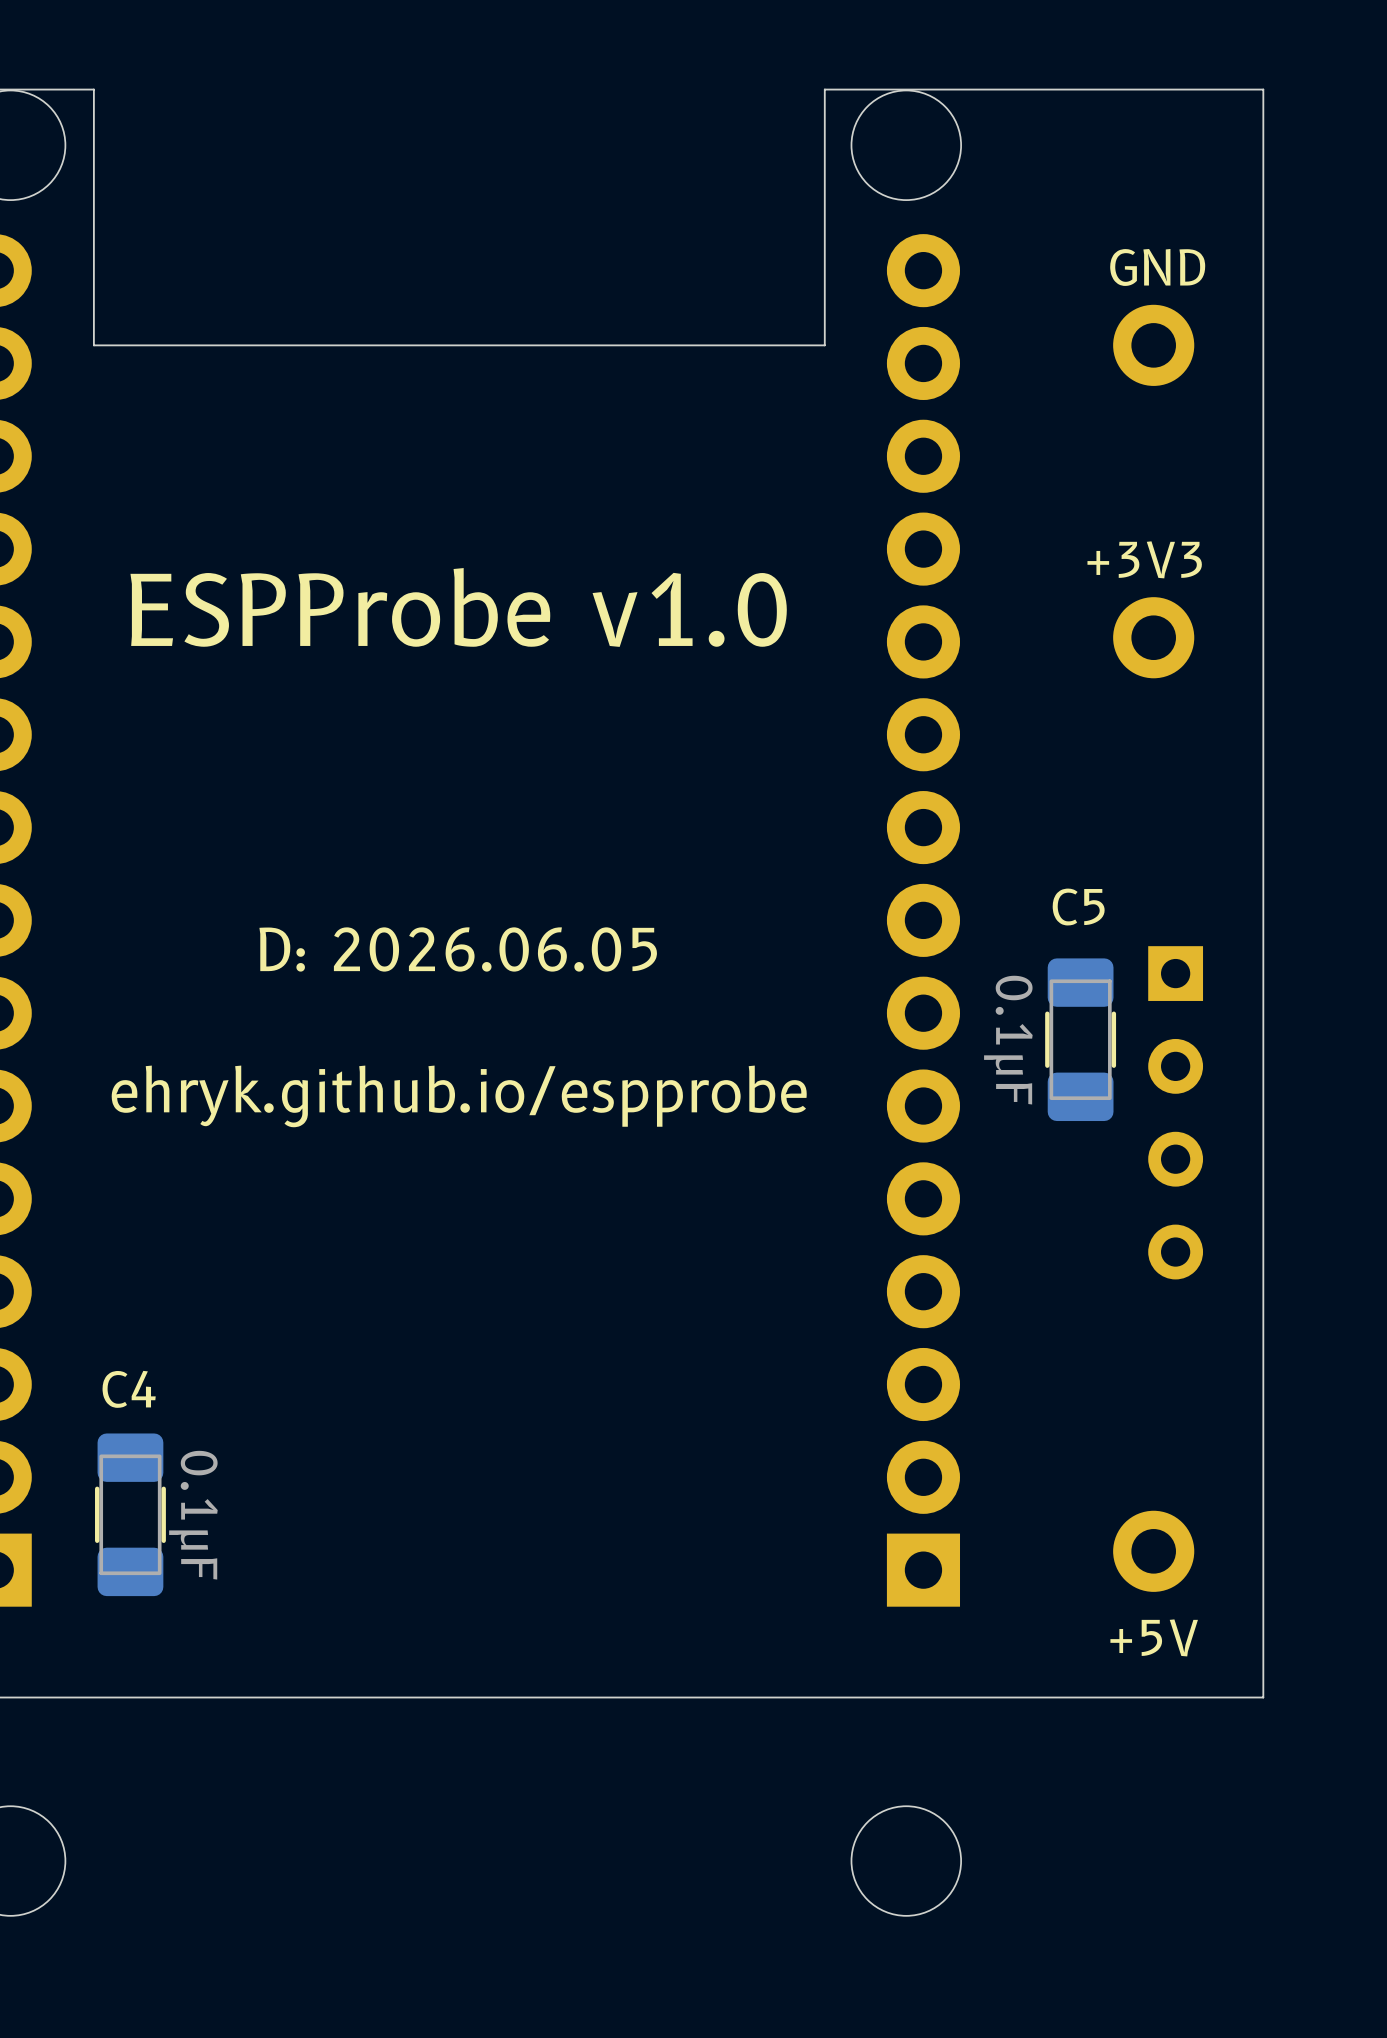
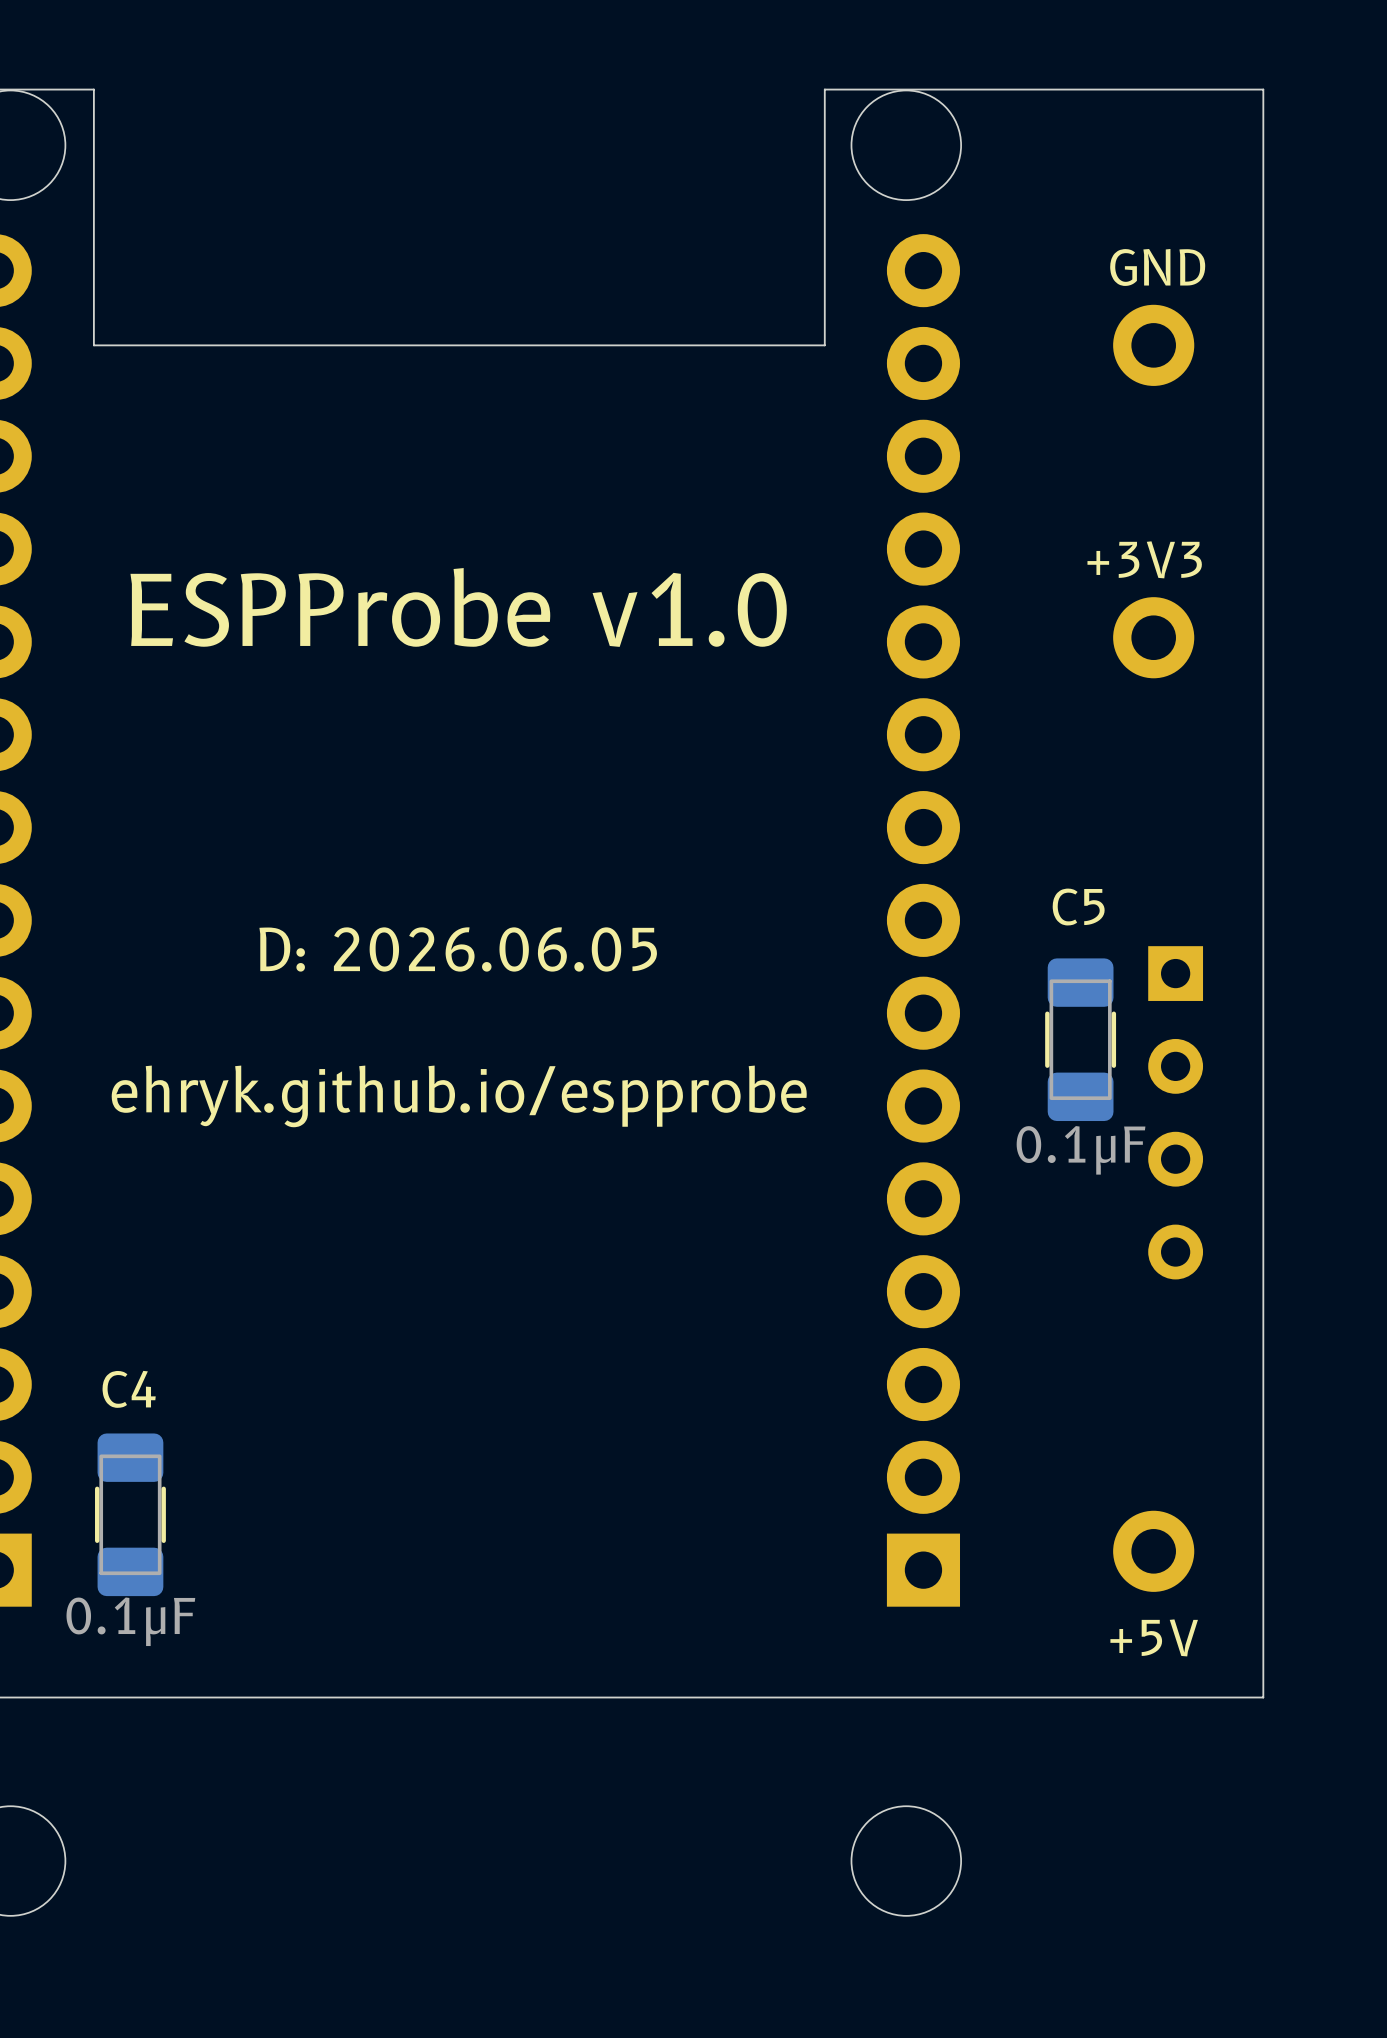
C5 value rotation: 0° (1008, 1040) -> 90° counterclockwise (1081, 1150)
C4 value rotation: 0° (193, 1515) -> 90° counterclockwise (130, 1621)

